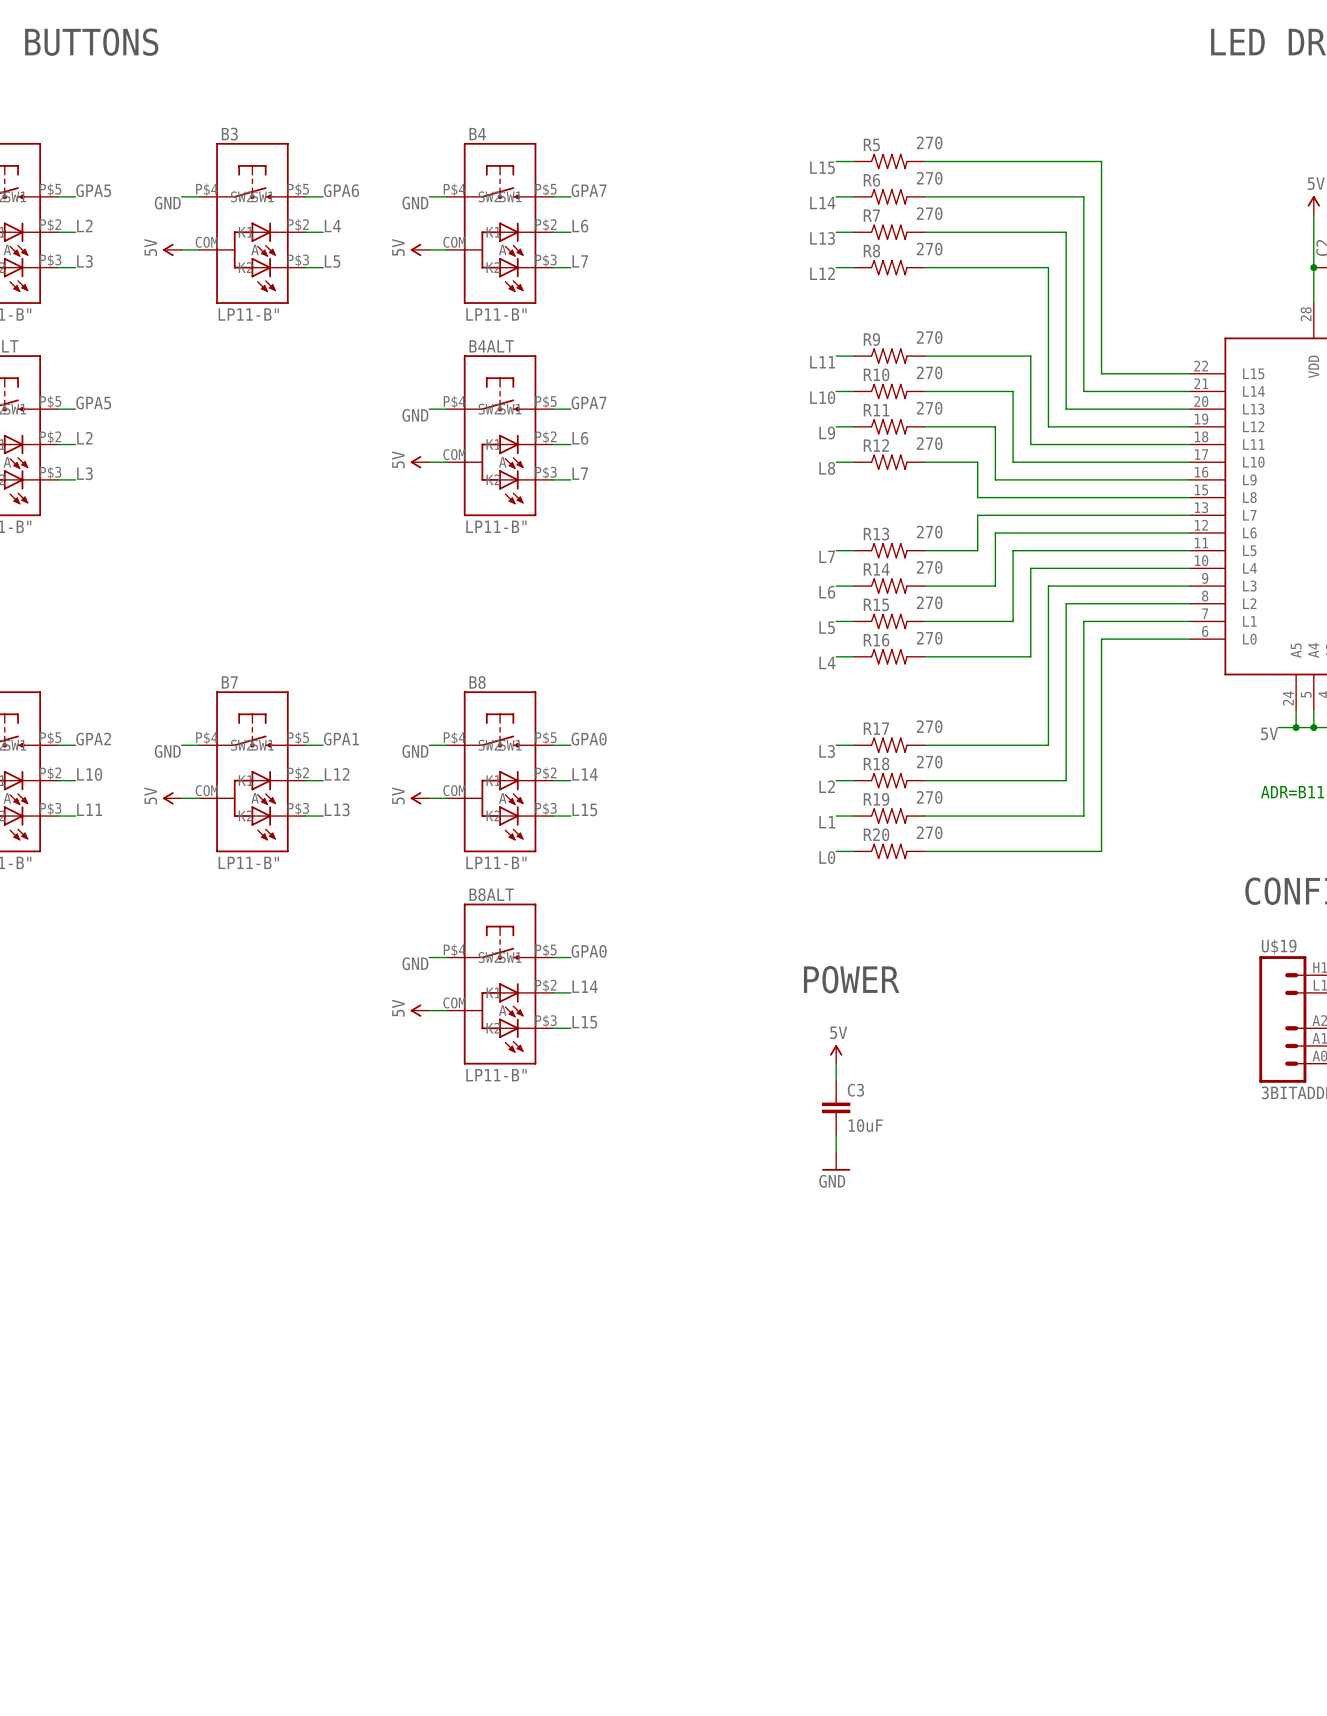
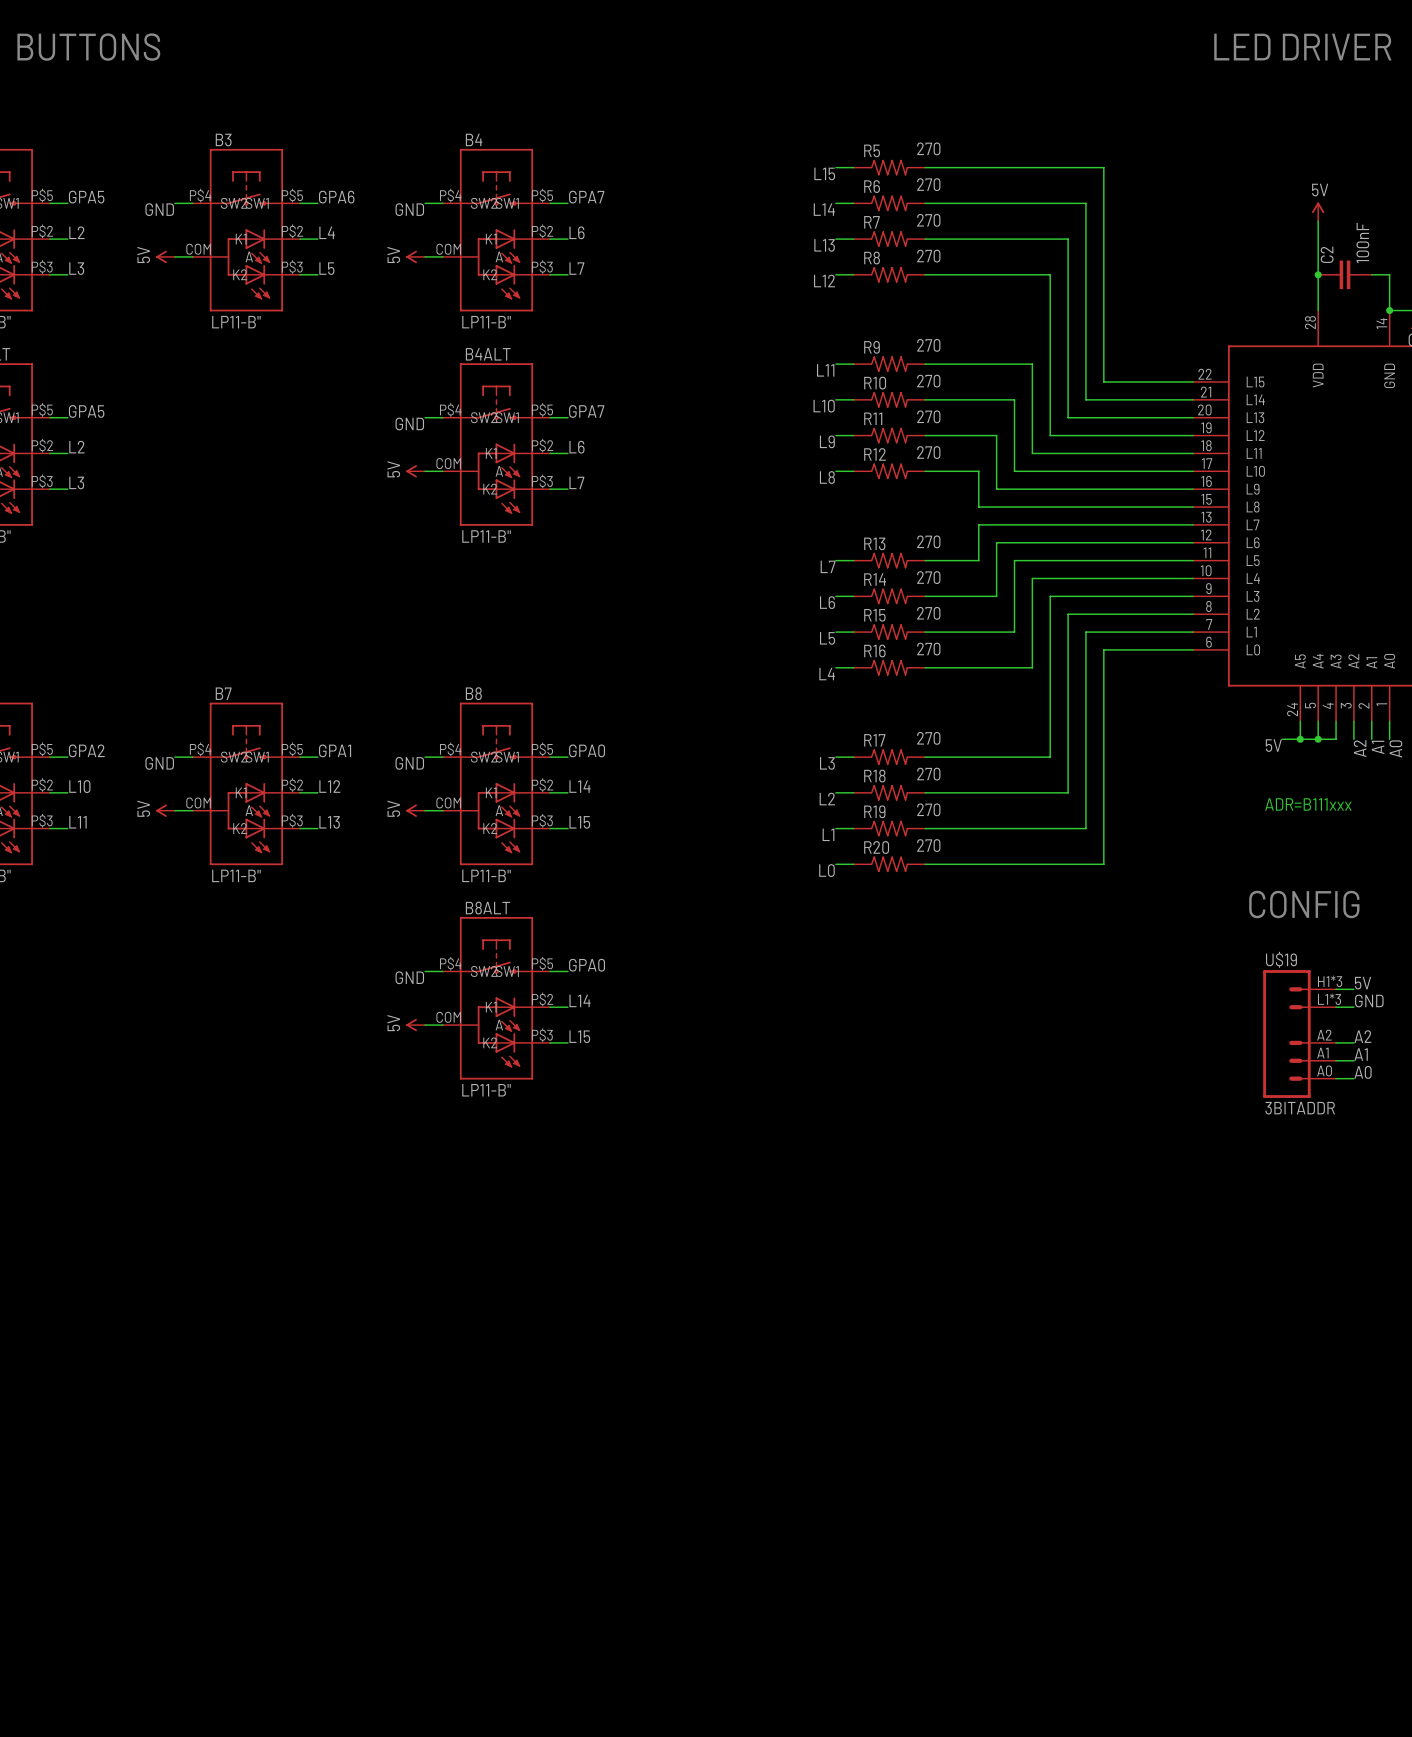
text: POWER (851, 979) -> none
power symbol: 5V (836, 1054) -> none
wire: (836, 1063) (836, 1081) -> none
C3: 10uF (836, 1107) -> none
wire: (836, 1134) (836, 1152) -> none
power symbol: GND (836, 1161) -> none

